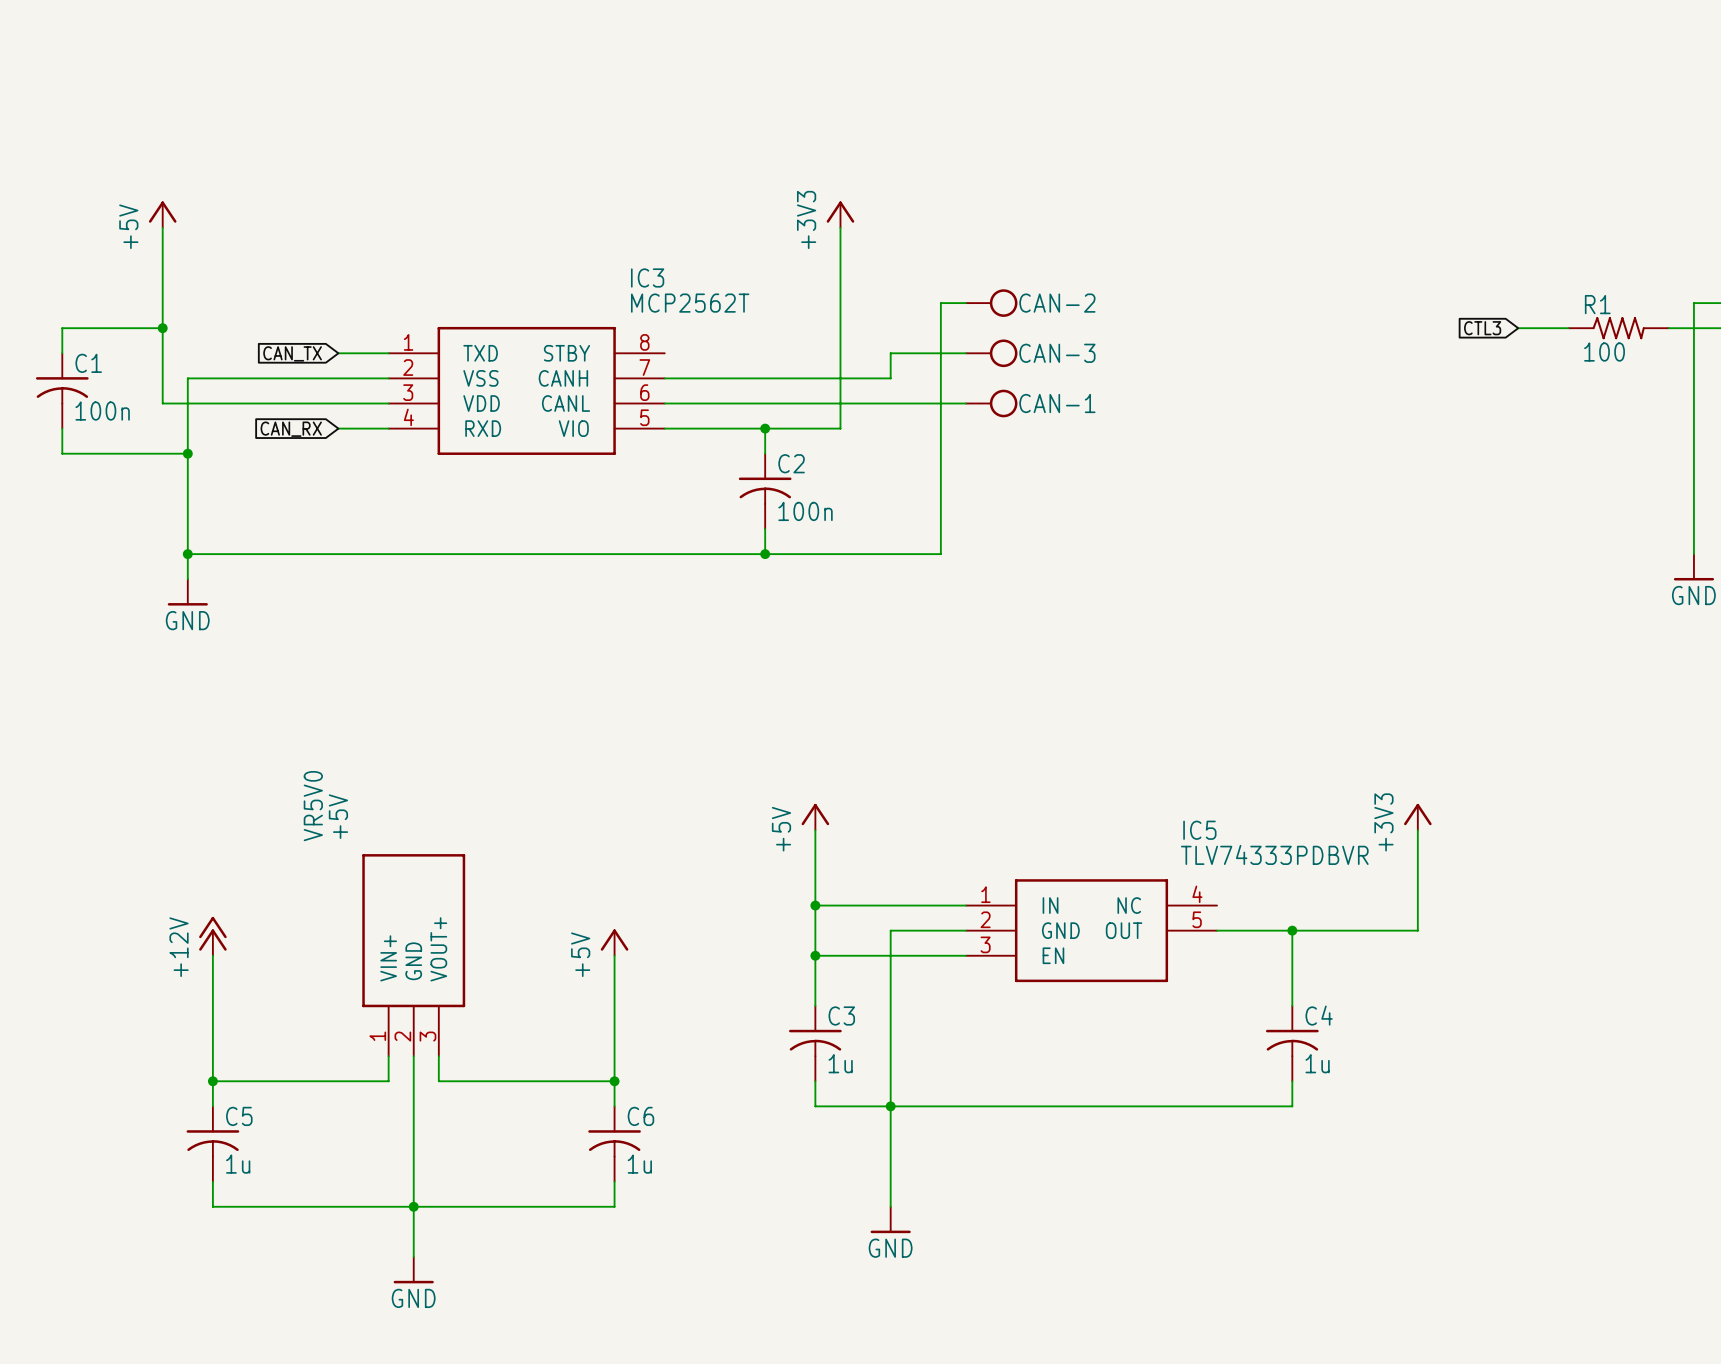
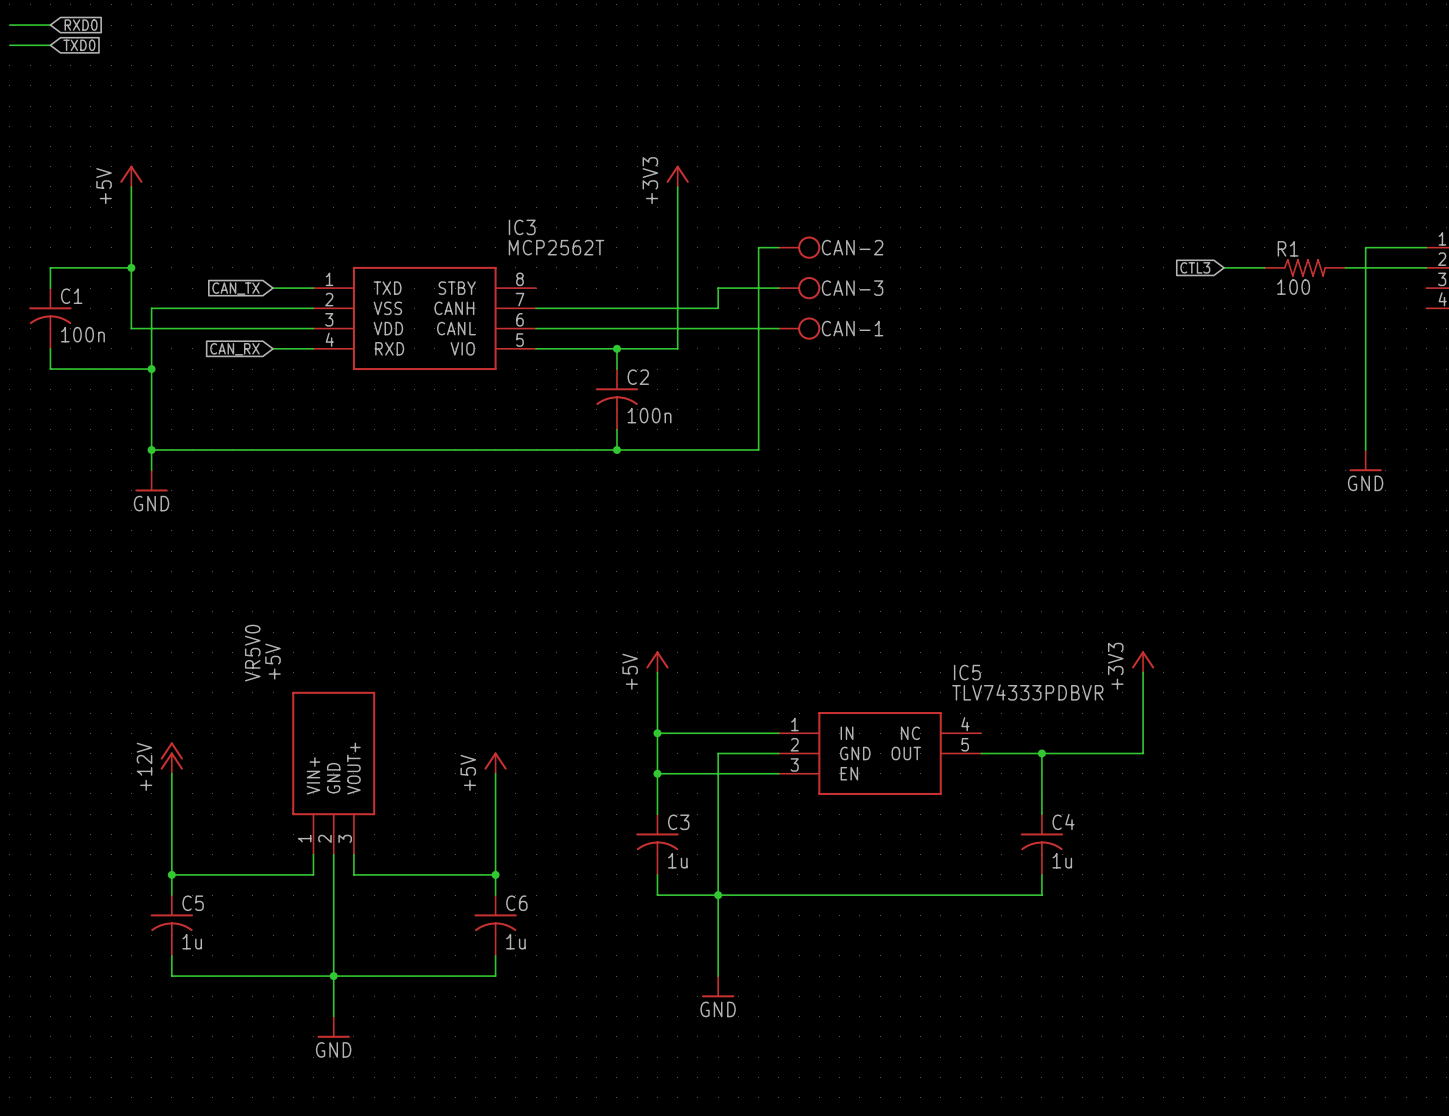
wire: none -> (9, 25) (50, 25)
global label: none -> RXD0 (81, 25)
wire: none -> (9, 45) (50, 45)
global label: none -> TXD0 (79, 45)

